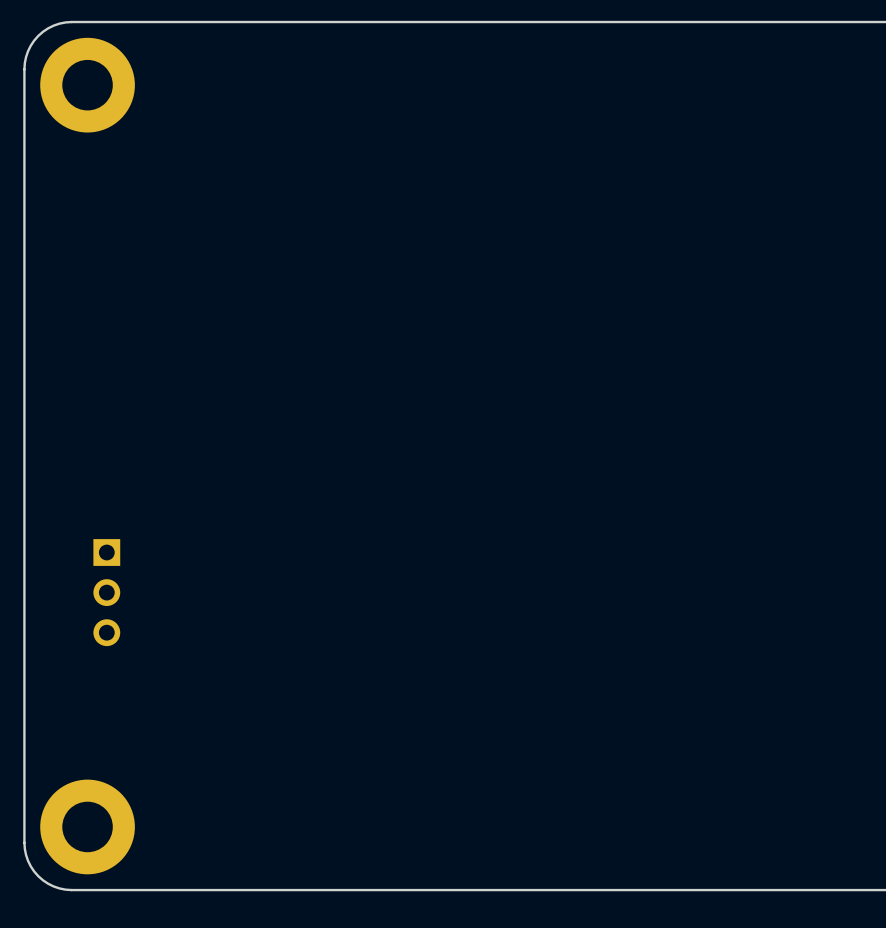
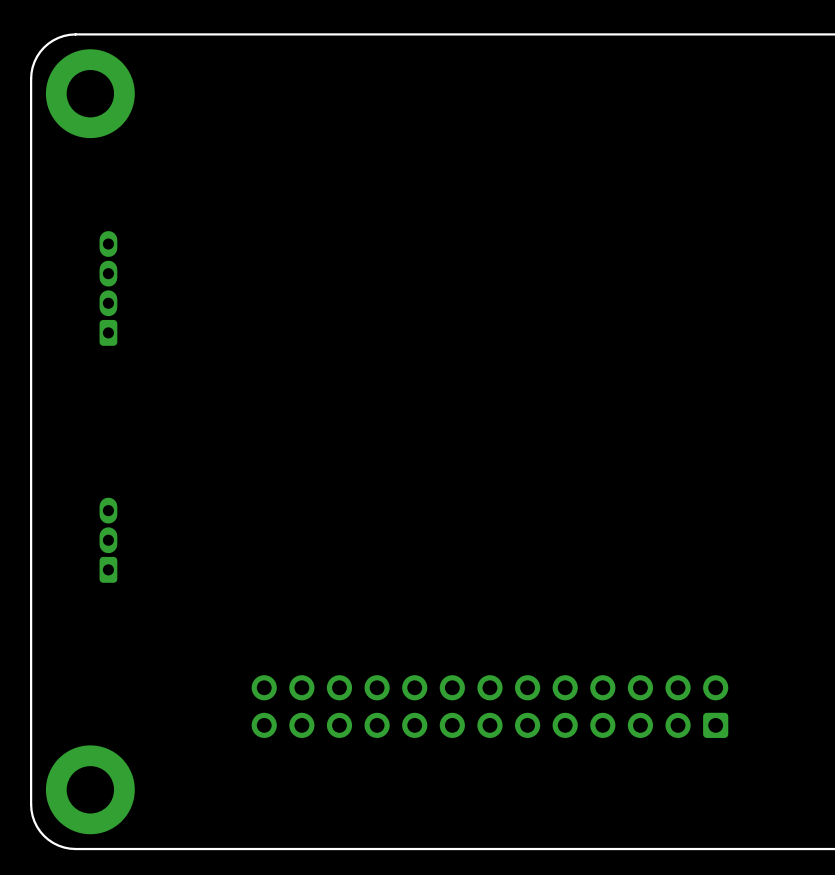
part: none -> (108, 288)
part: none -> (108, 540)
part: (106, 592) -> none
part: none -> (489, 706)

